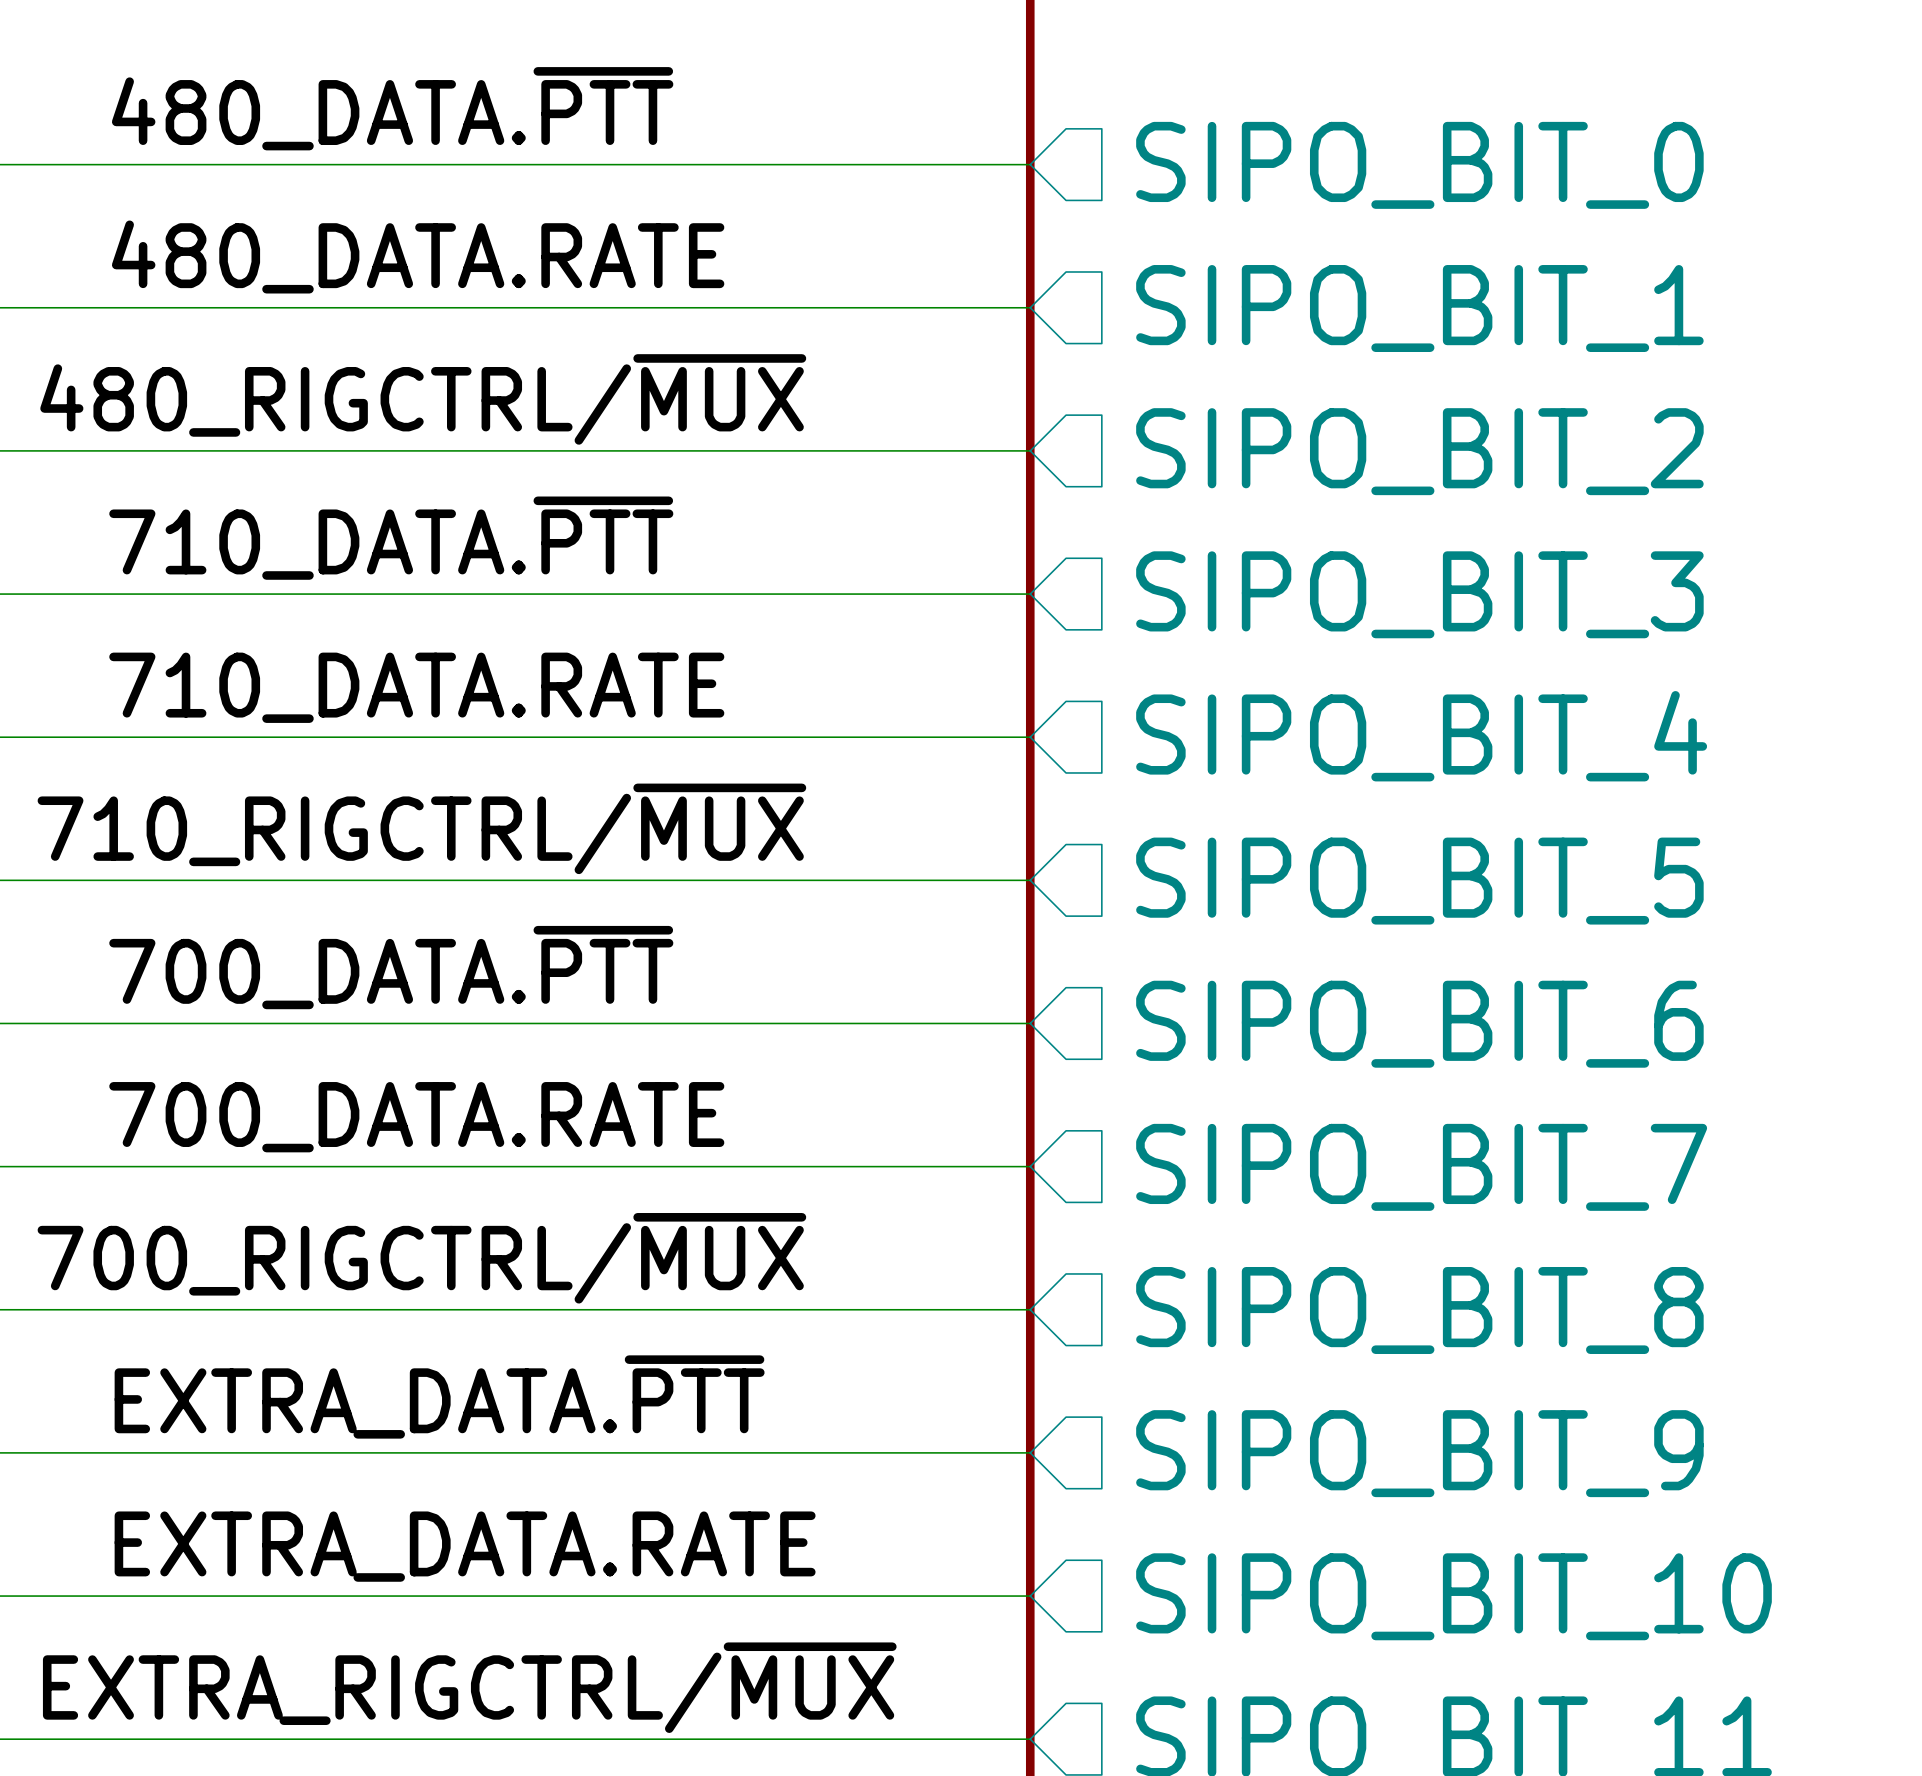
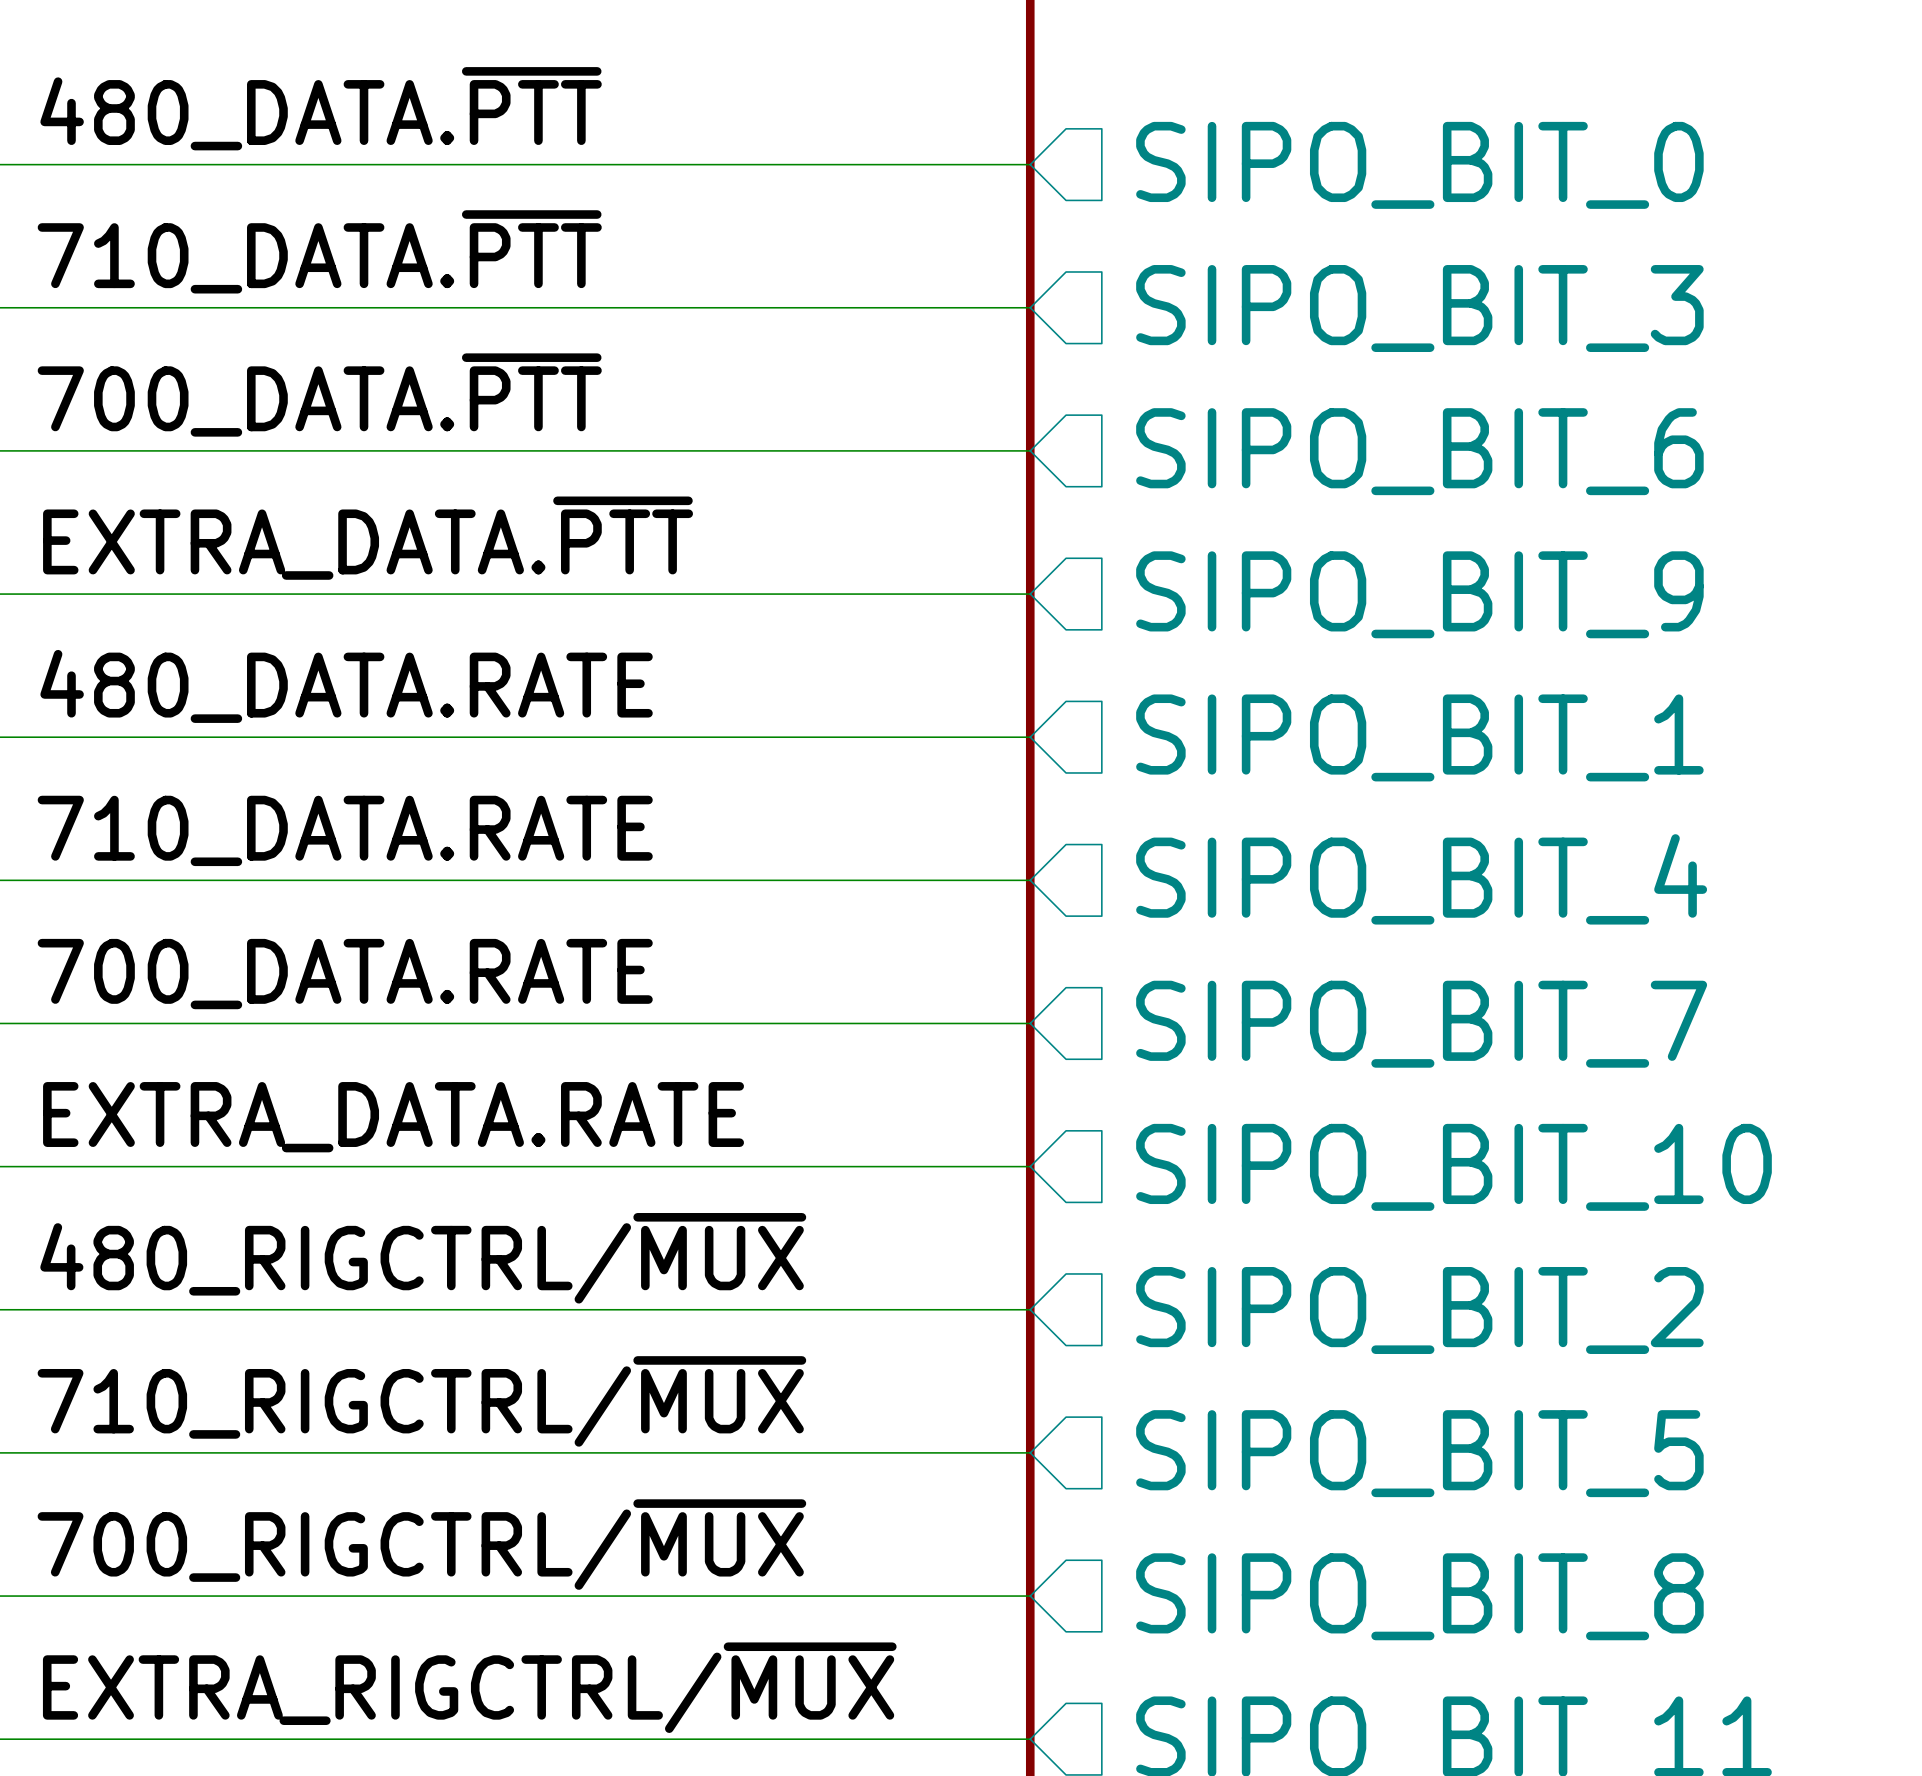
label position: 480_DATA.~{PTT} (392, 108) -> 480_DATA.~{PTT} (321, 108)
label position: 480_DATA.RATE (418, 257) -> 480_DATA.RATE (346, 686)
sheet pin: SIPO_BIT_1 (1419, 308) -> SIPO_BIT_3 (1419, 308)
label: 480_RIGCTRL/~{MUX} (423, 399) -> 700_DATA.~{PTT} (319, 395)
sheet pin: SIPO_BIT_2 (1419, 451) -> SIPO_BIT_6 (1419, 451)
label position: 710_DATA.~{PTT} (391, 538) -> 710_DATA.~{PTT} (319, 251)
sheet pin: SIPO_BIT_3 (1419, 594) -> SIPO_BIT_9 (1419, 594)
label: 710_DATA.RATE (416, 687) -> none
sheet pin: SIPO_BIT_4 (1421, 736) -> SIPO_BIT_1 (1419, 737)
label: 710_RIGCTRL/~{MUX} (421, 828) -> 710_DATA.RATE (345, 830)
sheet pin: SIPO_BIT_5 (1419, 881) -> SIPO_BIT_4 (1421, 879)
label: 700_DATA.~{PTT} (391, 967) -> none
sheet pin: SIPO_BIT_6 (1419, 1024) -> SIPO_BIT_7 (1421, 1024)
label position: 700_DATA.RATE (416, 1117) -> 700_DATA.RATE (345, 974)
sheet pin: SIPO_BIT_7 (1421, 1167) -> SIPO_BIT_10 (1453, 1167)
label: 700_RIGCTRL/~{MUX} (421, 1258) -> 480_RIGCTRL/~{MUX} (423, 1258)
sheet pin: SIPO_BIT_8 (1419, 1310) -> SIPO_BIT_2 (1419, 1310)
label position: EXTRA_DATA.~{PTT} (439, 1396) -> EXTRA_DATA.~{PTT} (368, 538)
label: none -> 710_RIGCTRL/~{MUX} (421, 1401)
sheet pin: SIPO_BIT_9 (1419, 1453) -> SIPO_BIT_5 (1419, 1453)
label: none -> 700_RIGCTRL/~{MUX} (421, 1544)
label position: EXTRA_DATA.RATE (465, 1546) -> EXTRA_DATA.RATE (393, 1117)
sheet pin: SIPO_BIT_10 (1453, 1596) -> SIPO_BIT_8 (1419, 1596)

